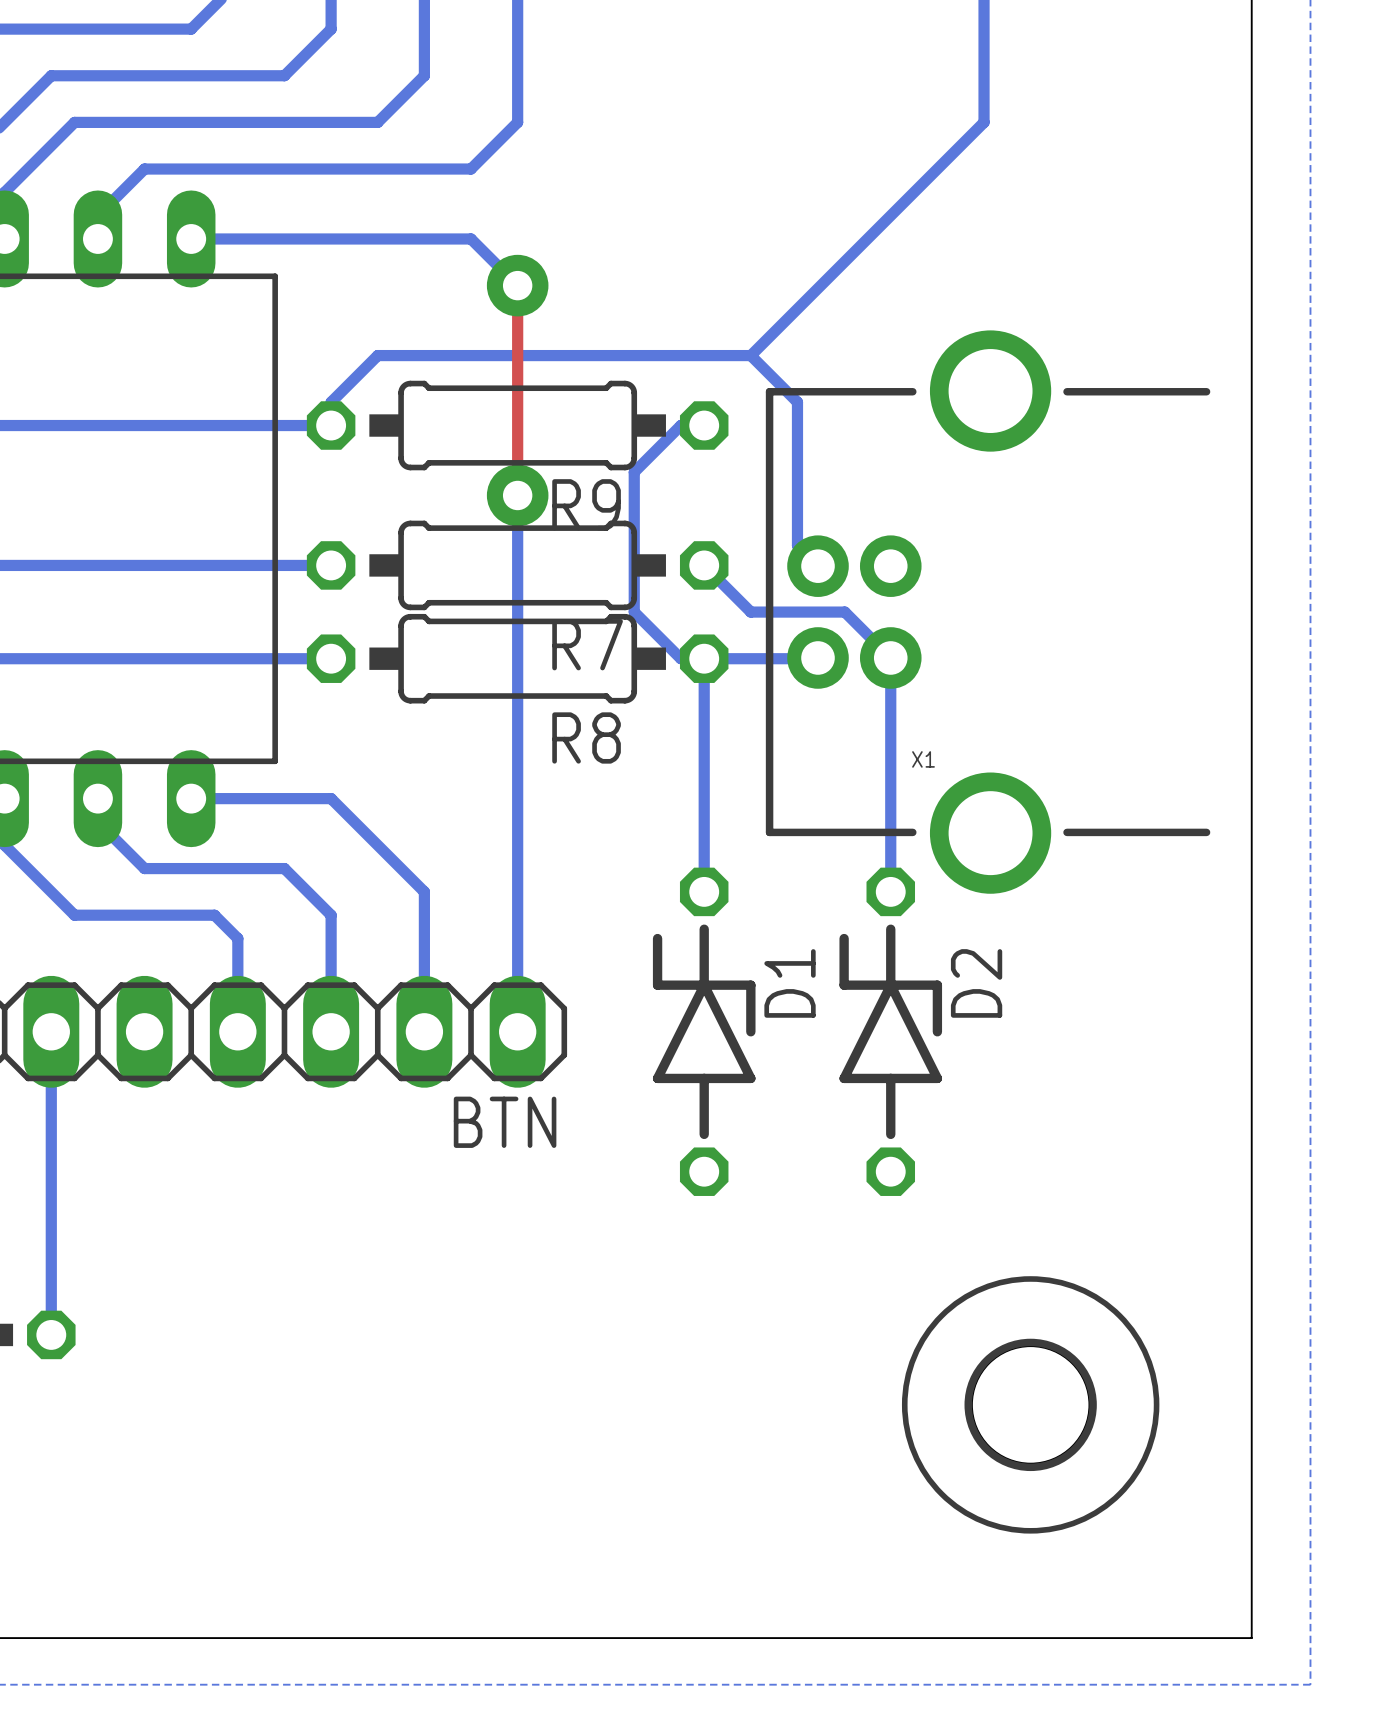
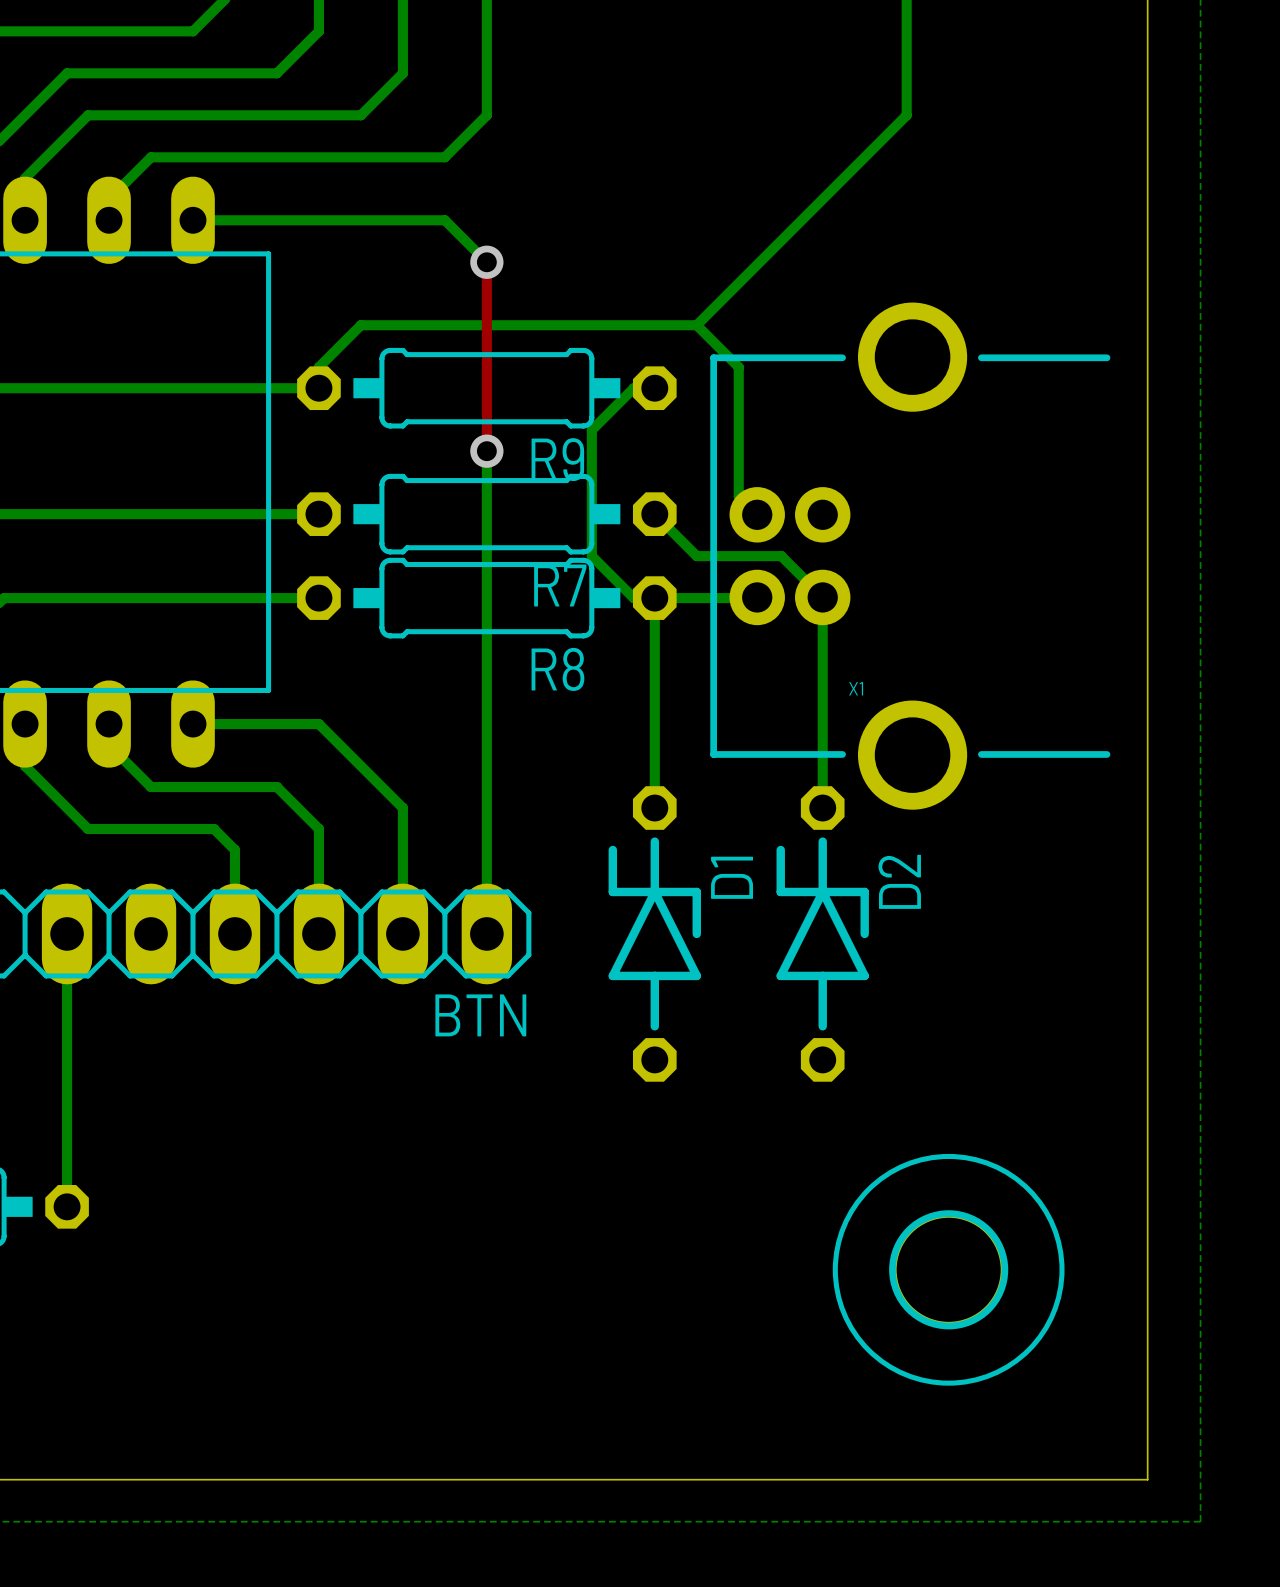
via size: [486, 254, 549, 317] -> [470, 245, 504, 279]
via size: [486, 464, 549, 527] -> [470, 434, 504, 468]

